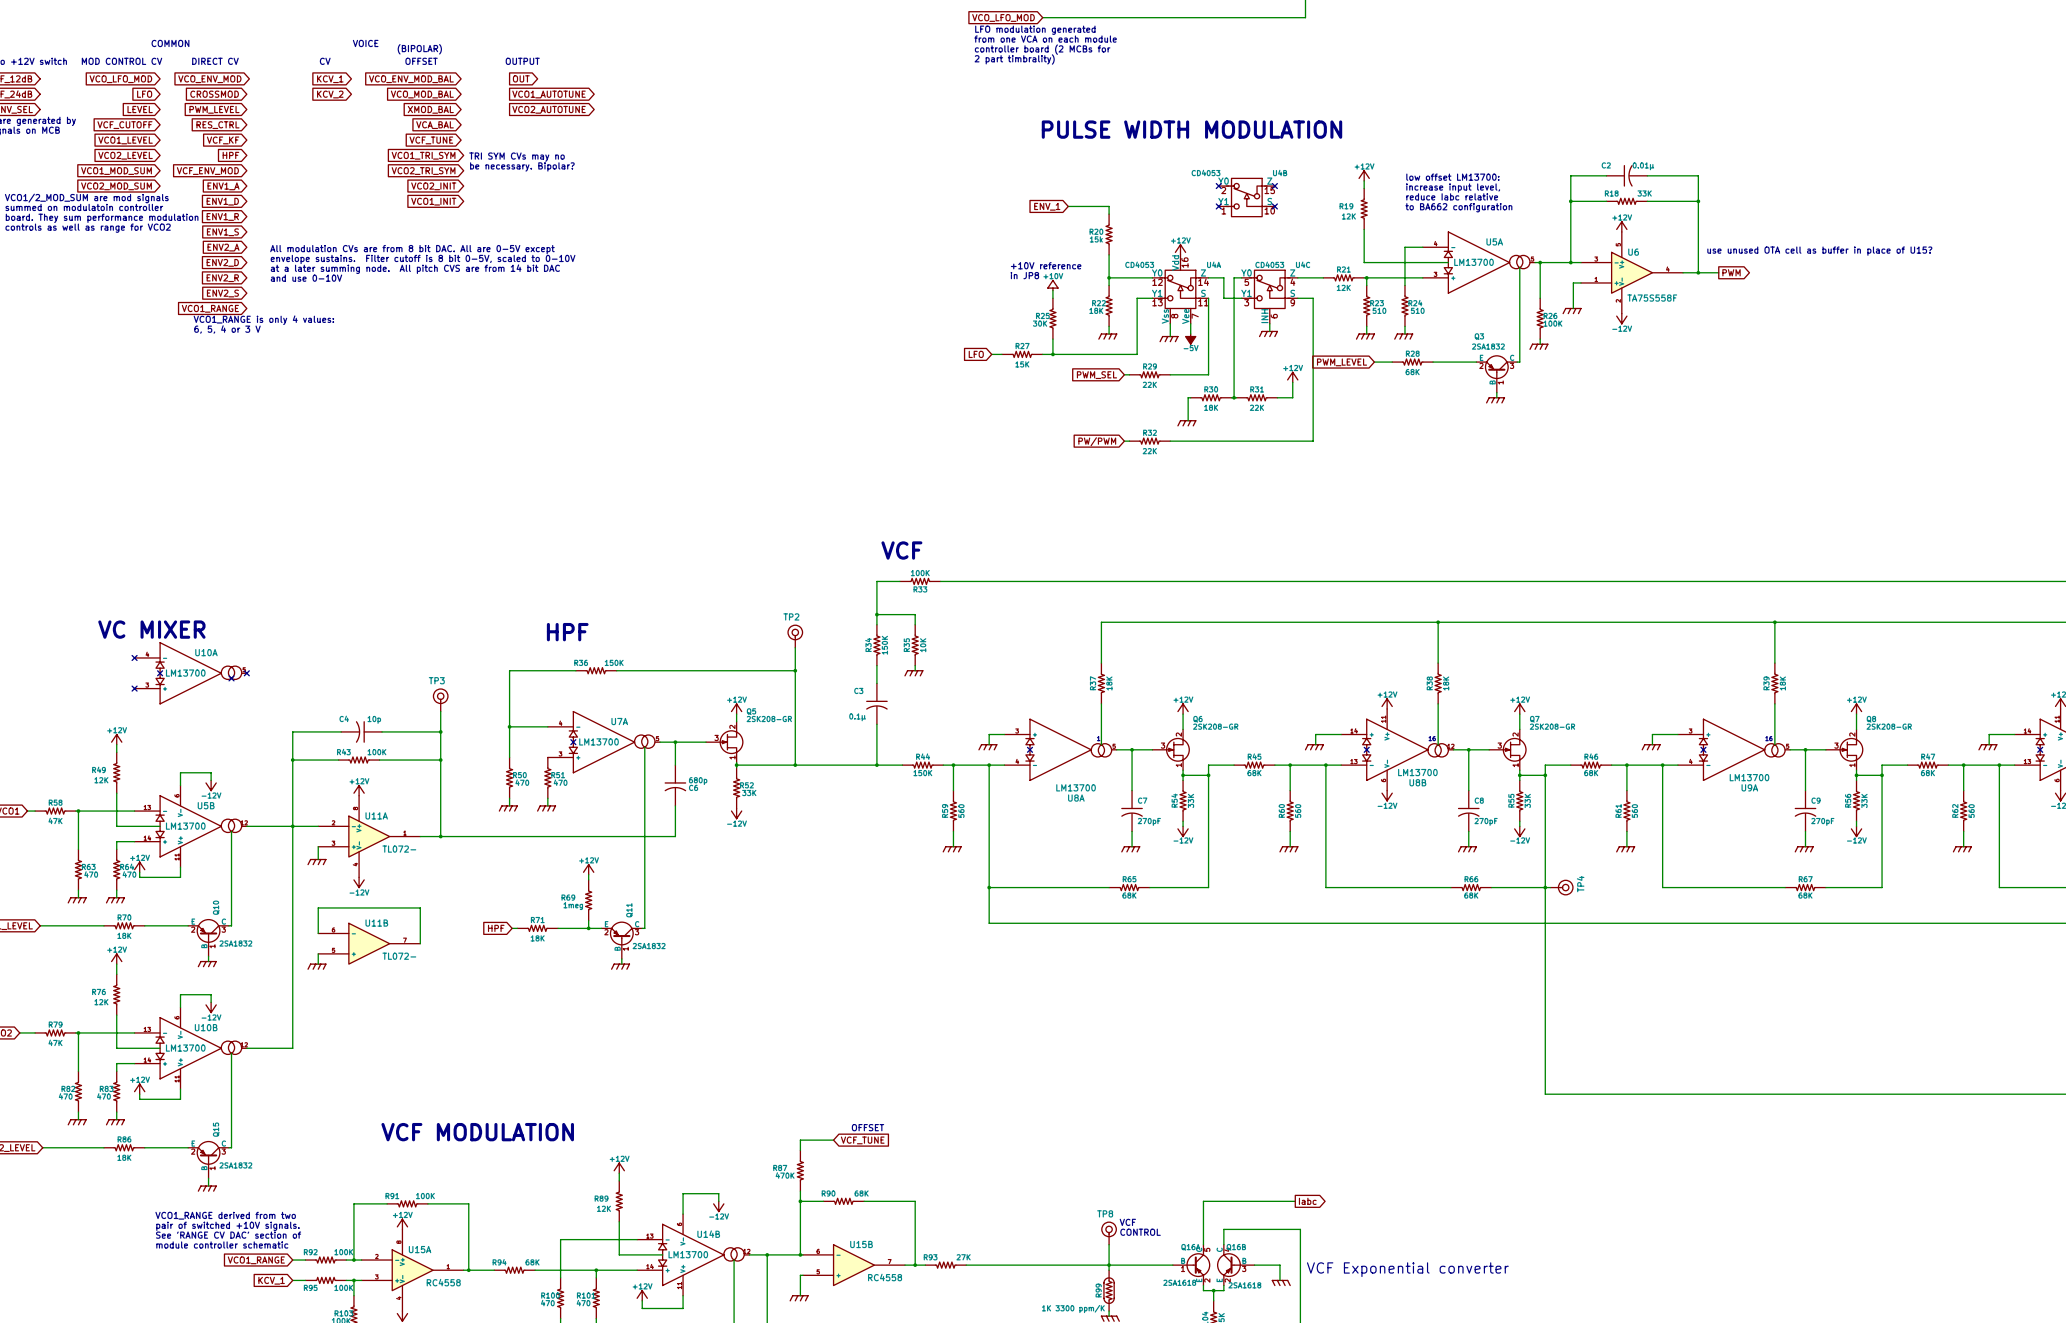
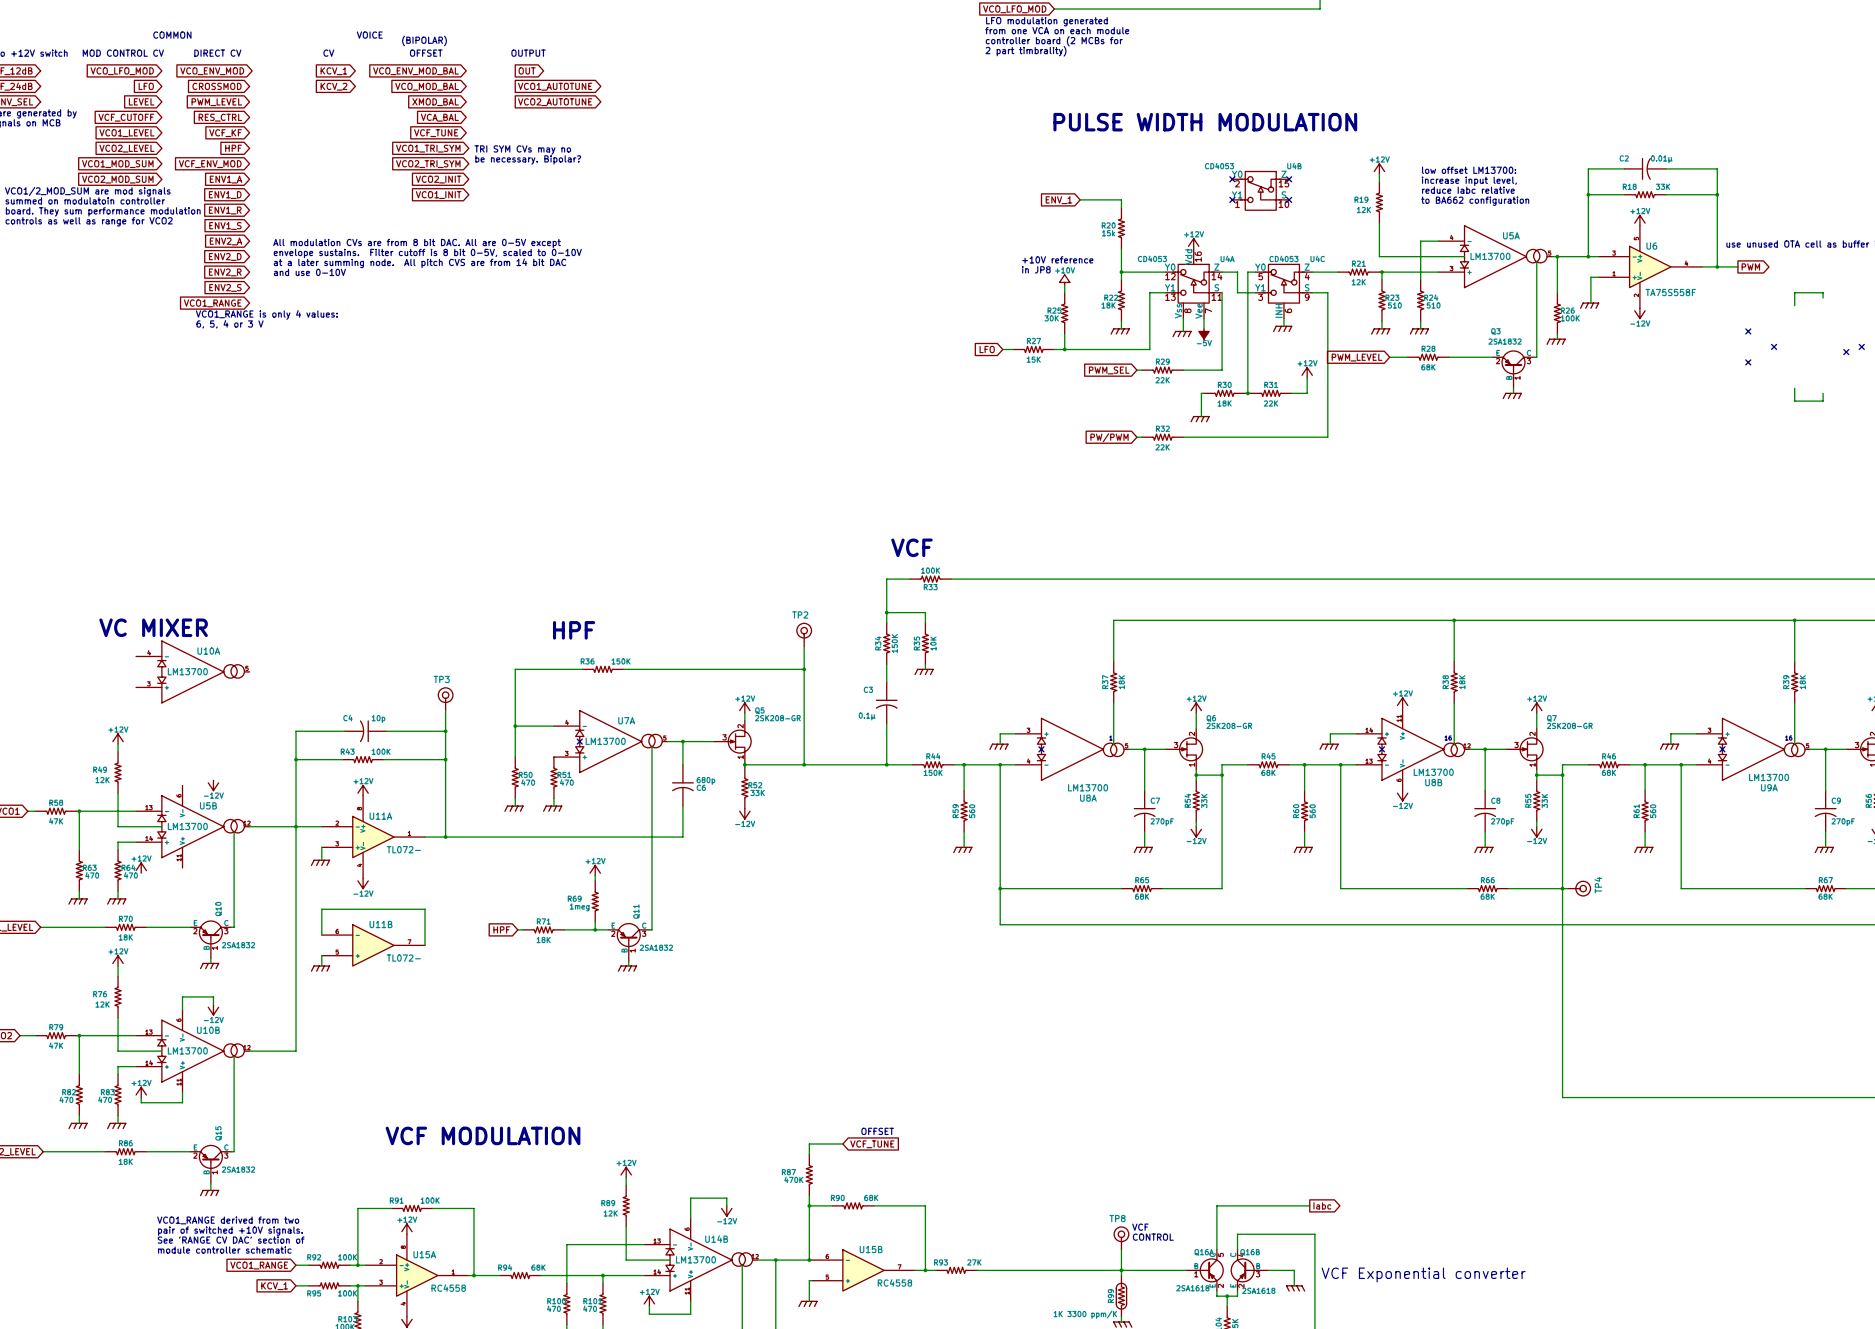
wire: none -> (1823, 297) (1823, 292) (1794, 292) (1794, 305)
no-connect mark: none -> (1748, 331)
no-connect mark: none -> (1774, 346)
no-connect mark: none -> (1861, 346)
no-connect mark: none -> (1846, 352)
no-connect mark: none -> (1748, 362)
wire: none -> (1794, 388) (1794, 401) (1823, 401) (1823, 393)
no-connect mark: (134, 657) -> none
no-connect mark: (160, 673) -> none
no-connect mark: (246, 673) -> none
no-connect mark: (231, 678) -> none
no-connect mark: (134, 688) -> none
wire: (211, 780) (211, 772) (180, 772) (180, 785) -> none
wire: (180, 867) (180, 877) (139, 877) (139, 872) -> none

